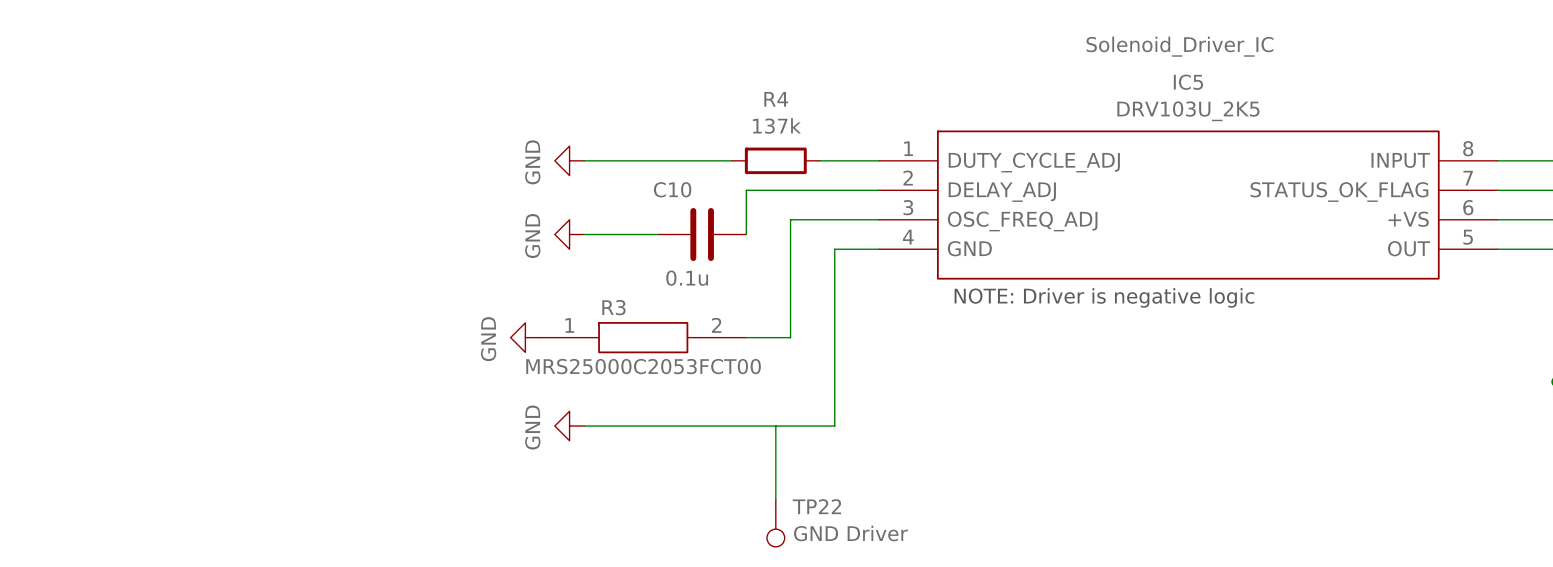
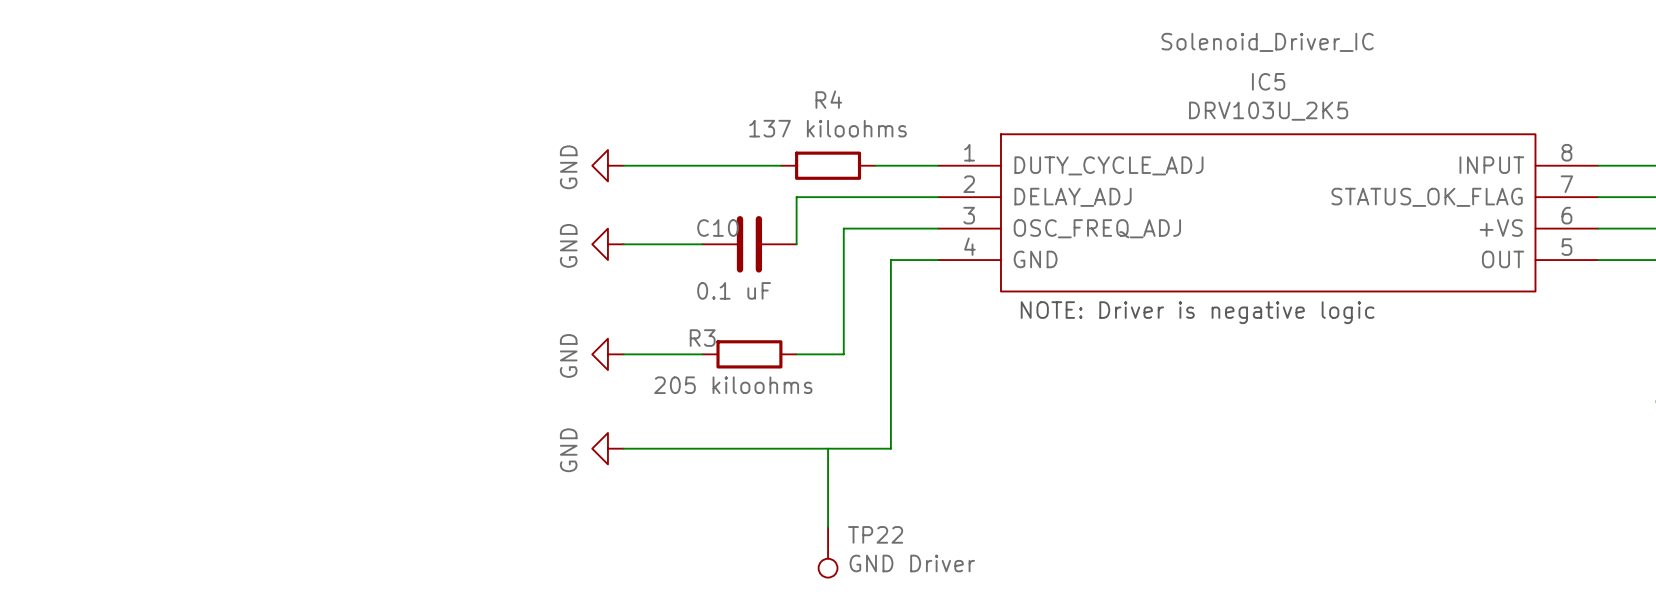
R4 value: 137k (776, 125) -> 137 kiloohms (828, 128)
C10 name position: C10 (672, 189) -> C10 (718, 228)
C10 value: 0.1u (687, 278) -> 0.1 uF (734, 290)
R3 symbol: [540, 322, 747, 354] -> [702, 340, 797, 369]
power symbol position: GND (525, 337) -> GND (607, 354)
wire: none -> (623, 354) (702, 354)
R3 value: MRS25000C2053FCT00 (643, 366) -> 205 kiloohms (733, 385)

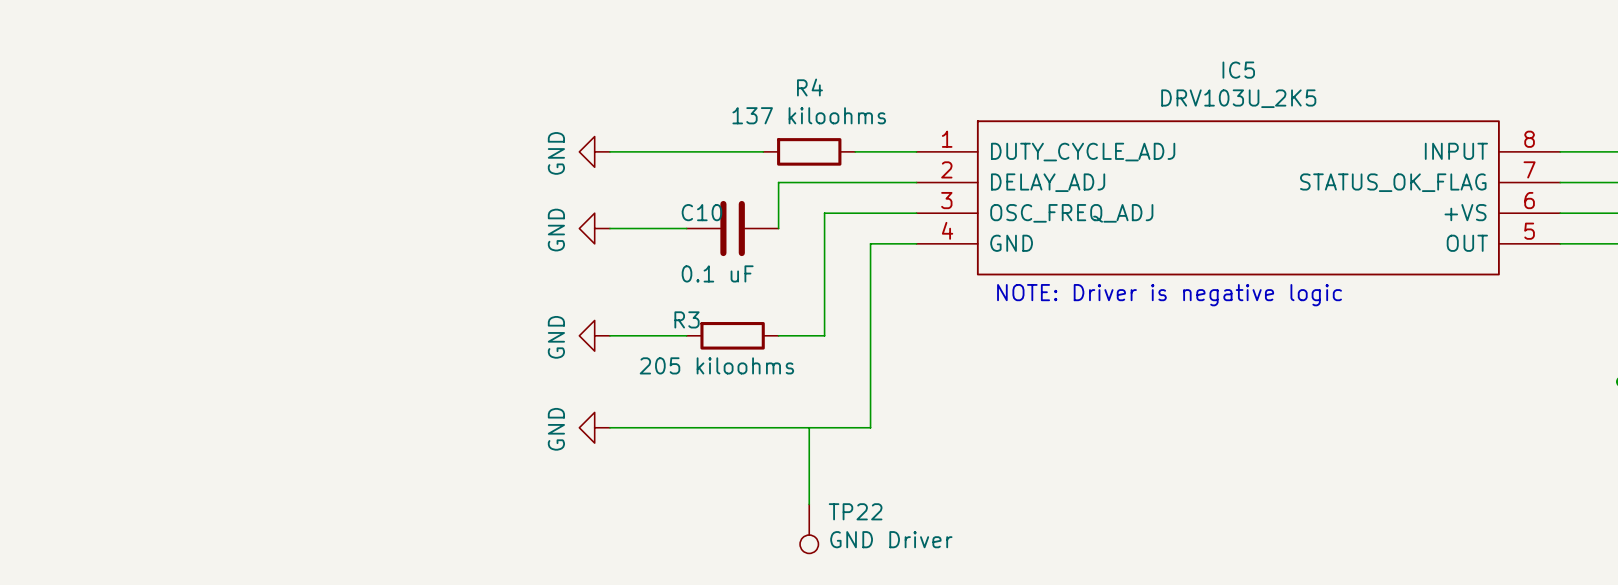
label: Solenoid_Driver_IC (1267, 42) -> none

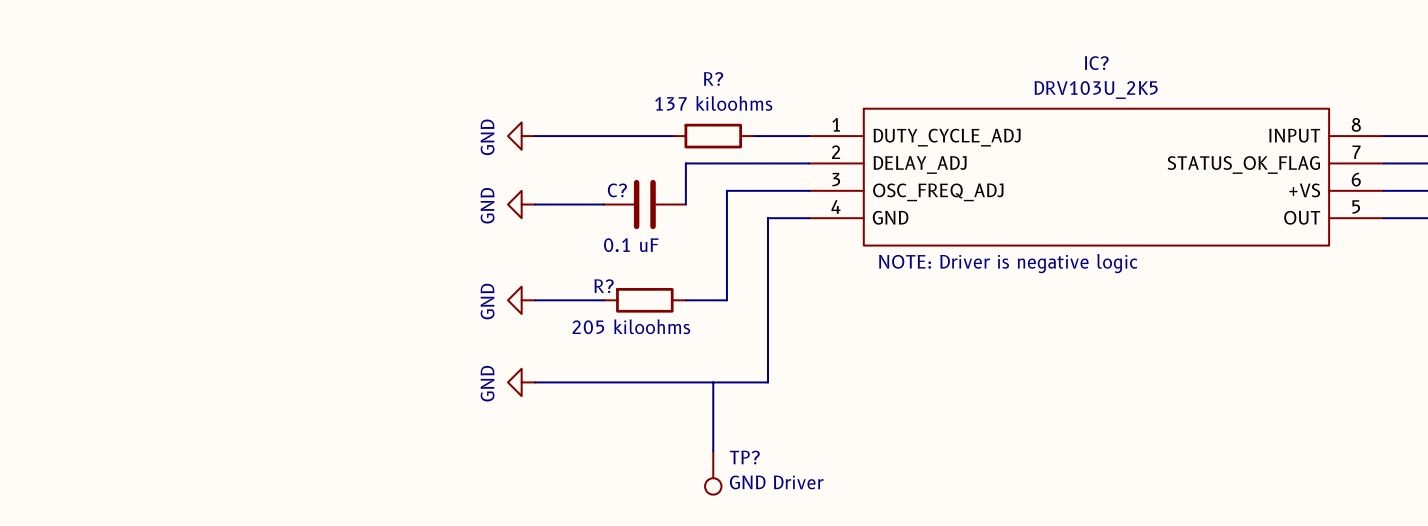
IC5 name: IC5 (1238, 70) -> IC? (1096, 63)
R4 name: R4 (809, 87) -> R? (713, 78)
C10 name: C10 (701, 212) -> C? (617, 190)
R3 name: R3 (687, 319) -> R? (604, 286)
TP22 name: TP22 (855, 511) -> TP? (744, 457)

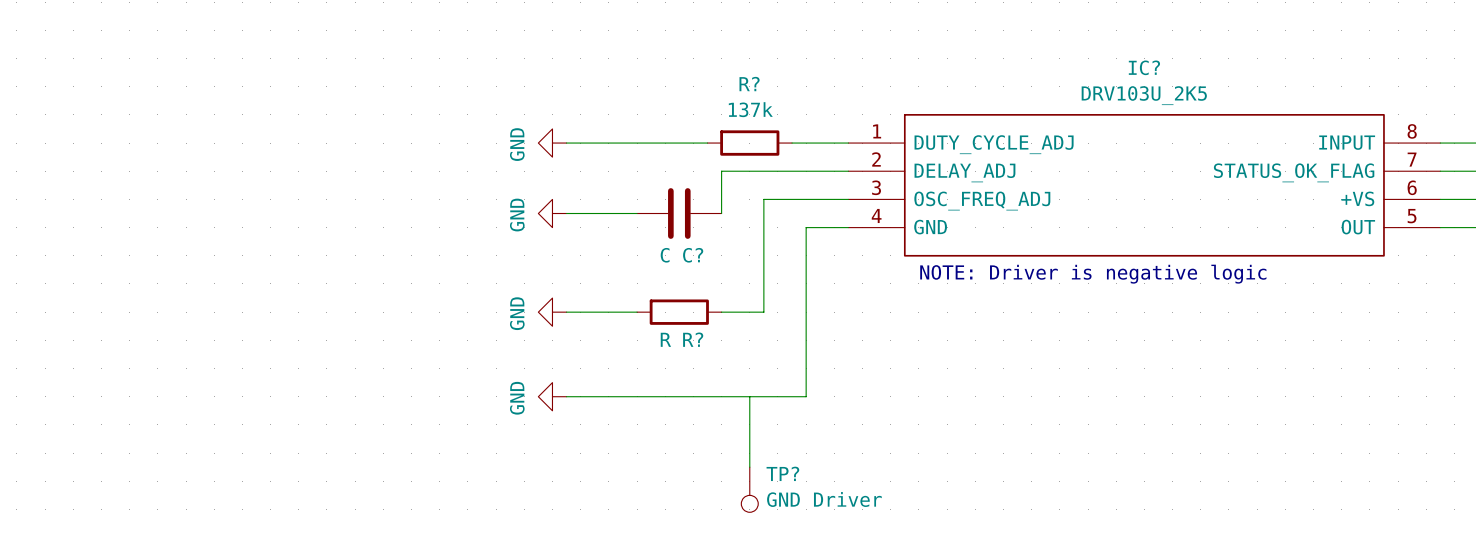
R? value: 137 kiloohms (713, 103) -> 137k (750, 109)
C? name position: C? (617, 190) -> C? (693, 255)
C? value: 0.1 uF (631, 245) -> C (665, 255)
R? name position: R? (604, 286) -> R? (693, 339)
R? value: 205 kiloohms (631, 326) -> R (665, 339)

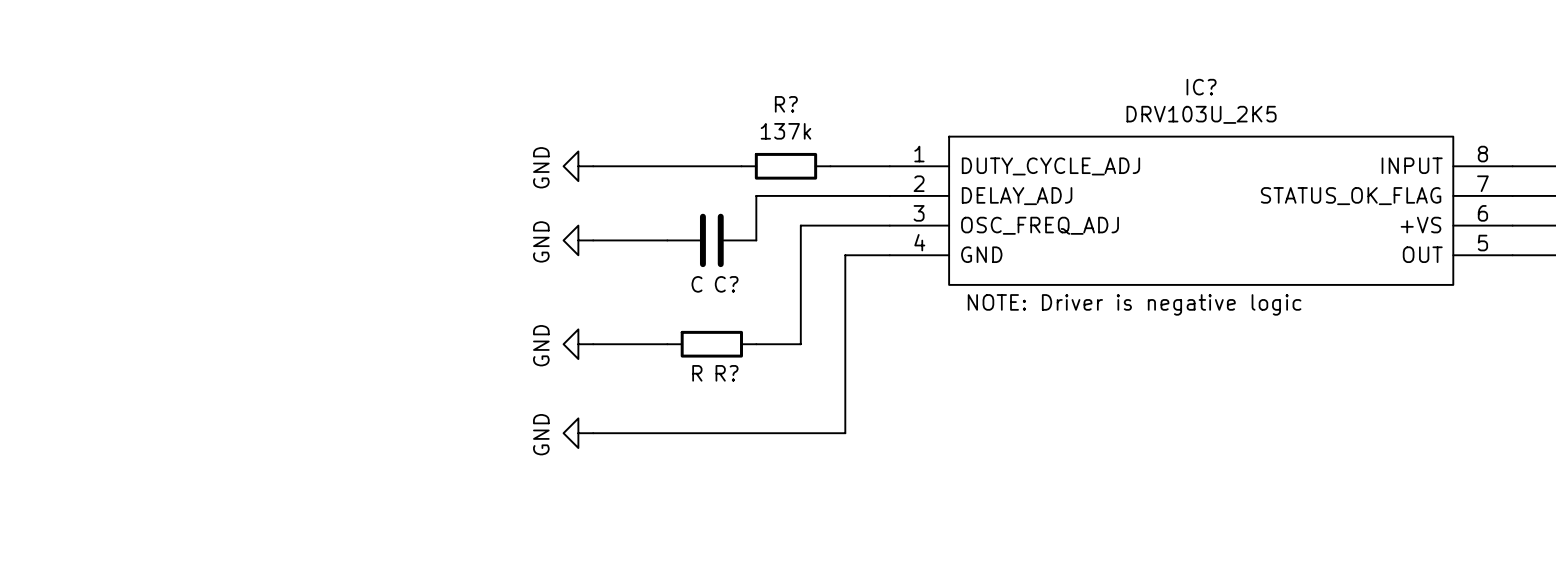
wire: (749, 396) (749, 467) -> none
TP?: GND Driver (749, 489) -> none

